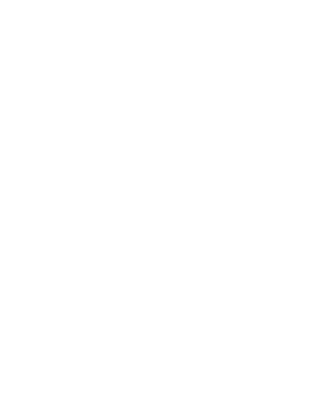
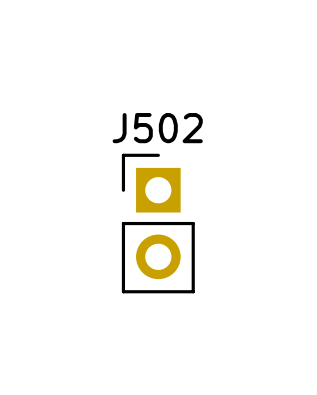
J502: none -> (158, 223)

